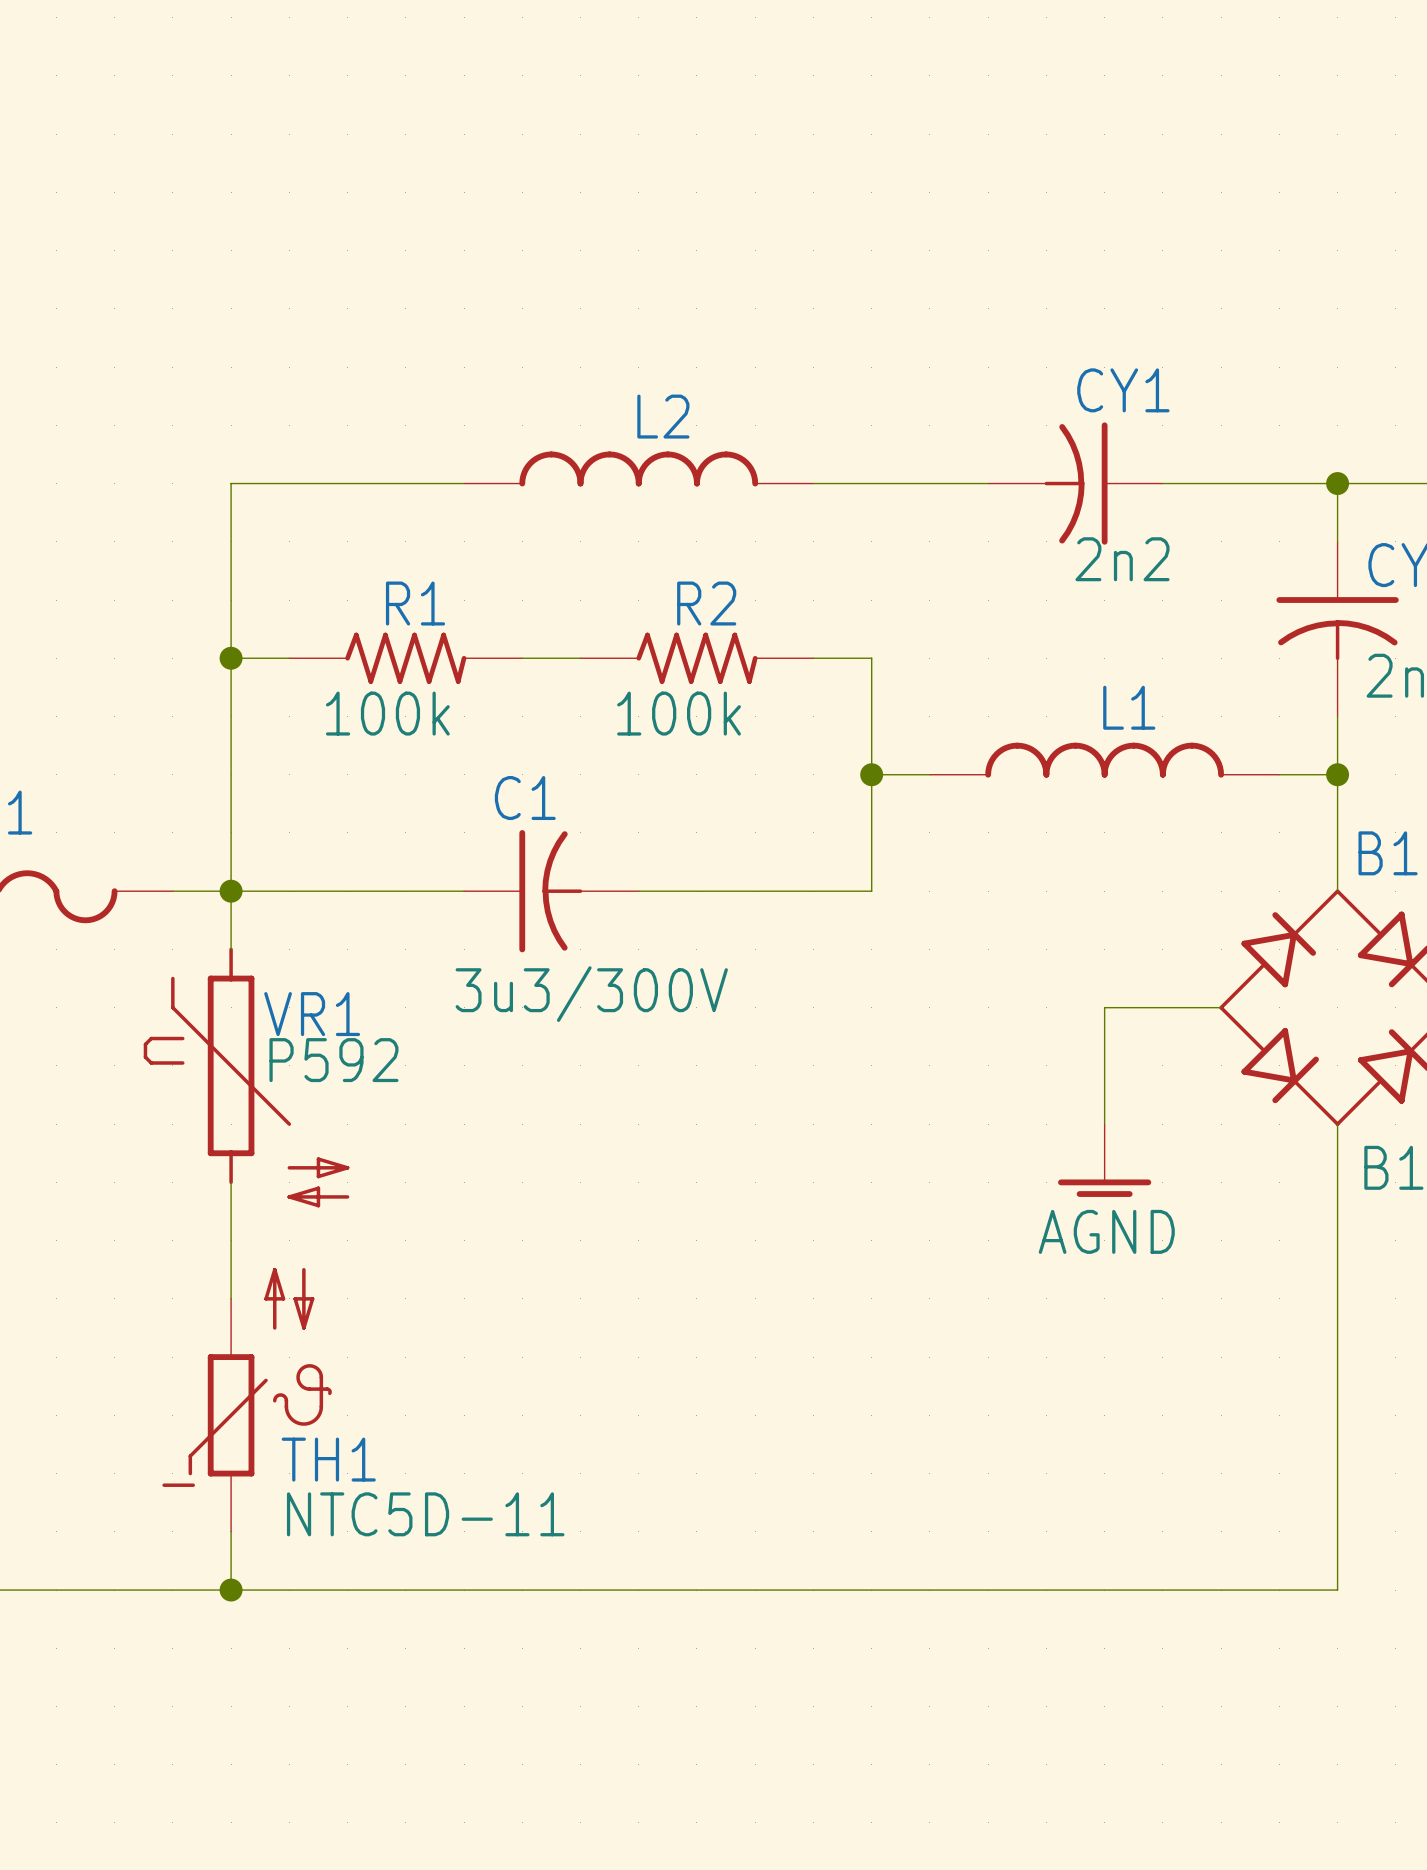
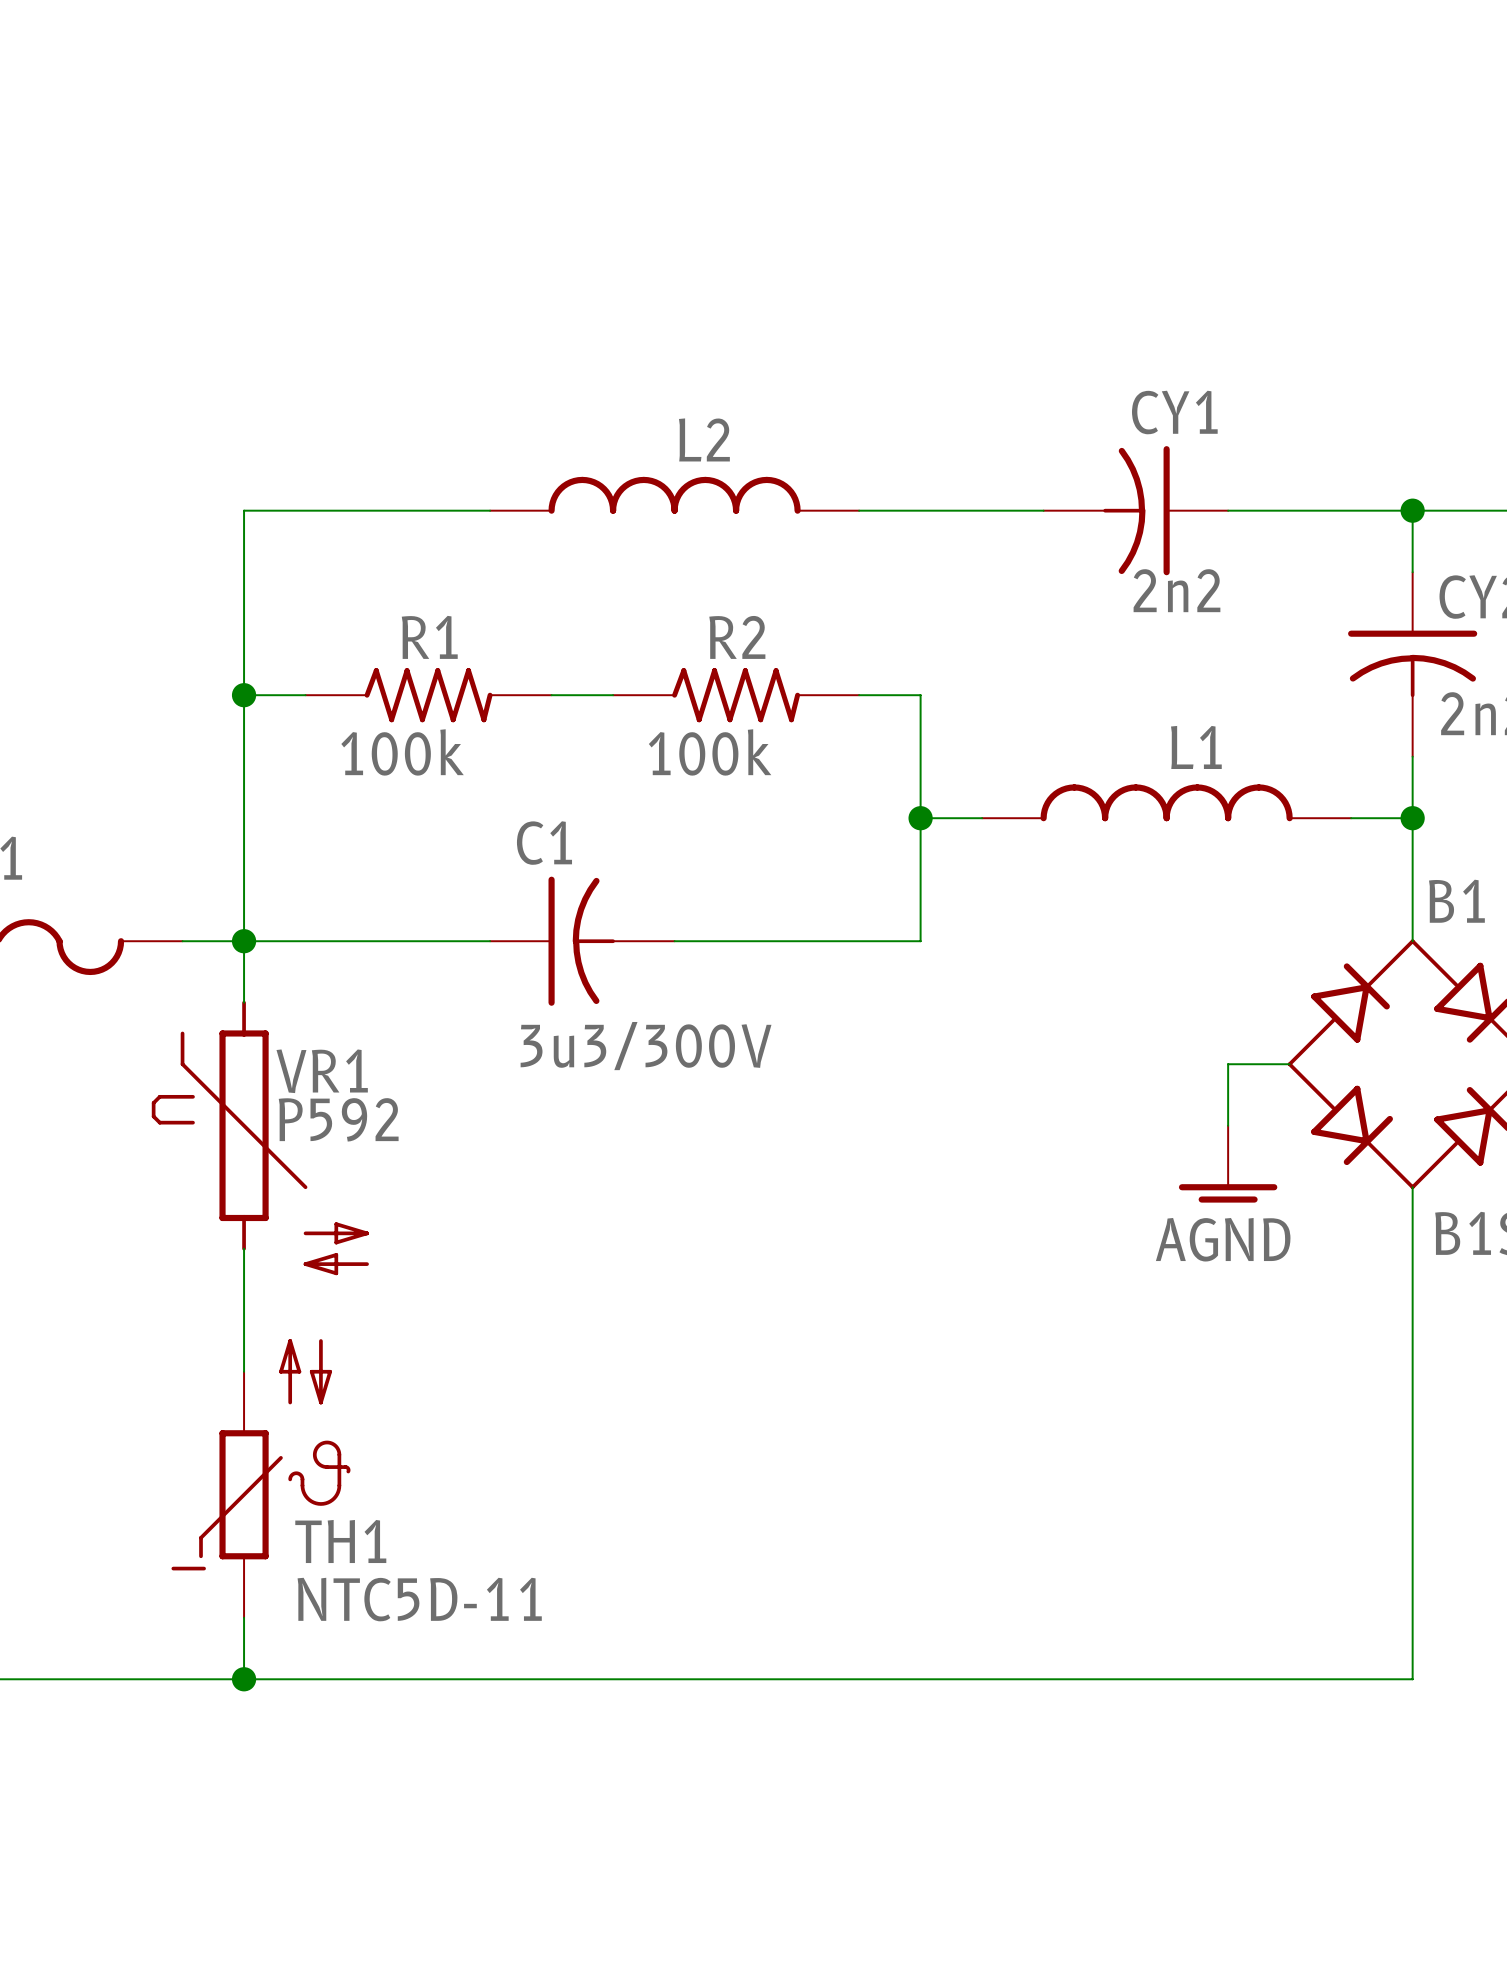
wire: (1162, 1007) (1104, 1007) (1104, 1124) -> (1228, 1064) (1228, 1125)
power symbol position: AGND (1104, 1160) -> AGND (1228, 1164)

